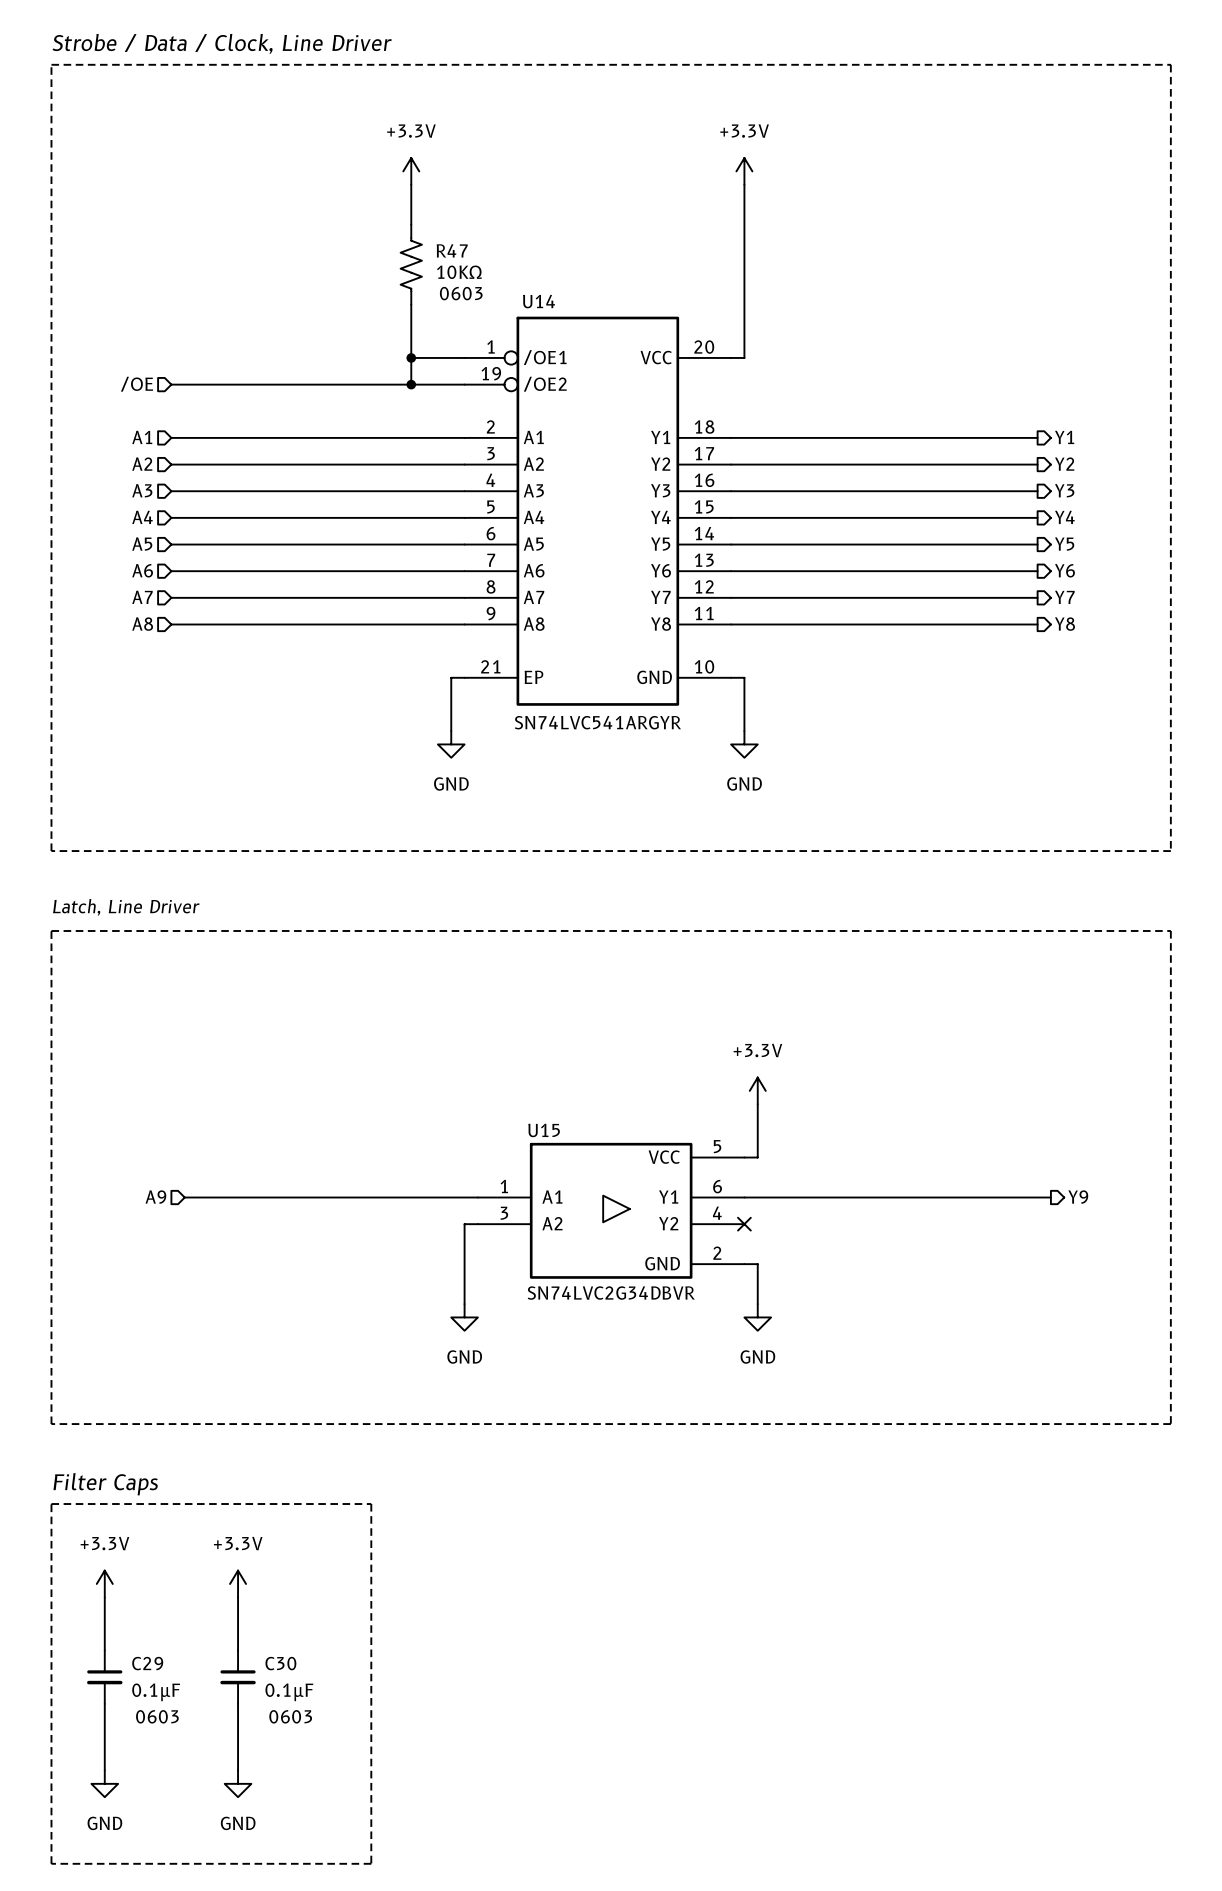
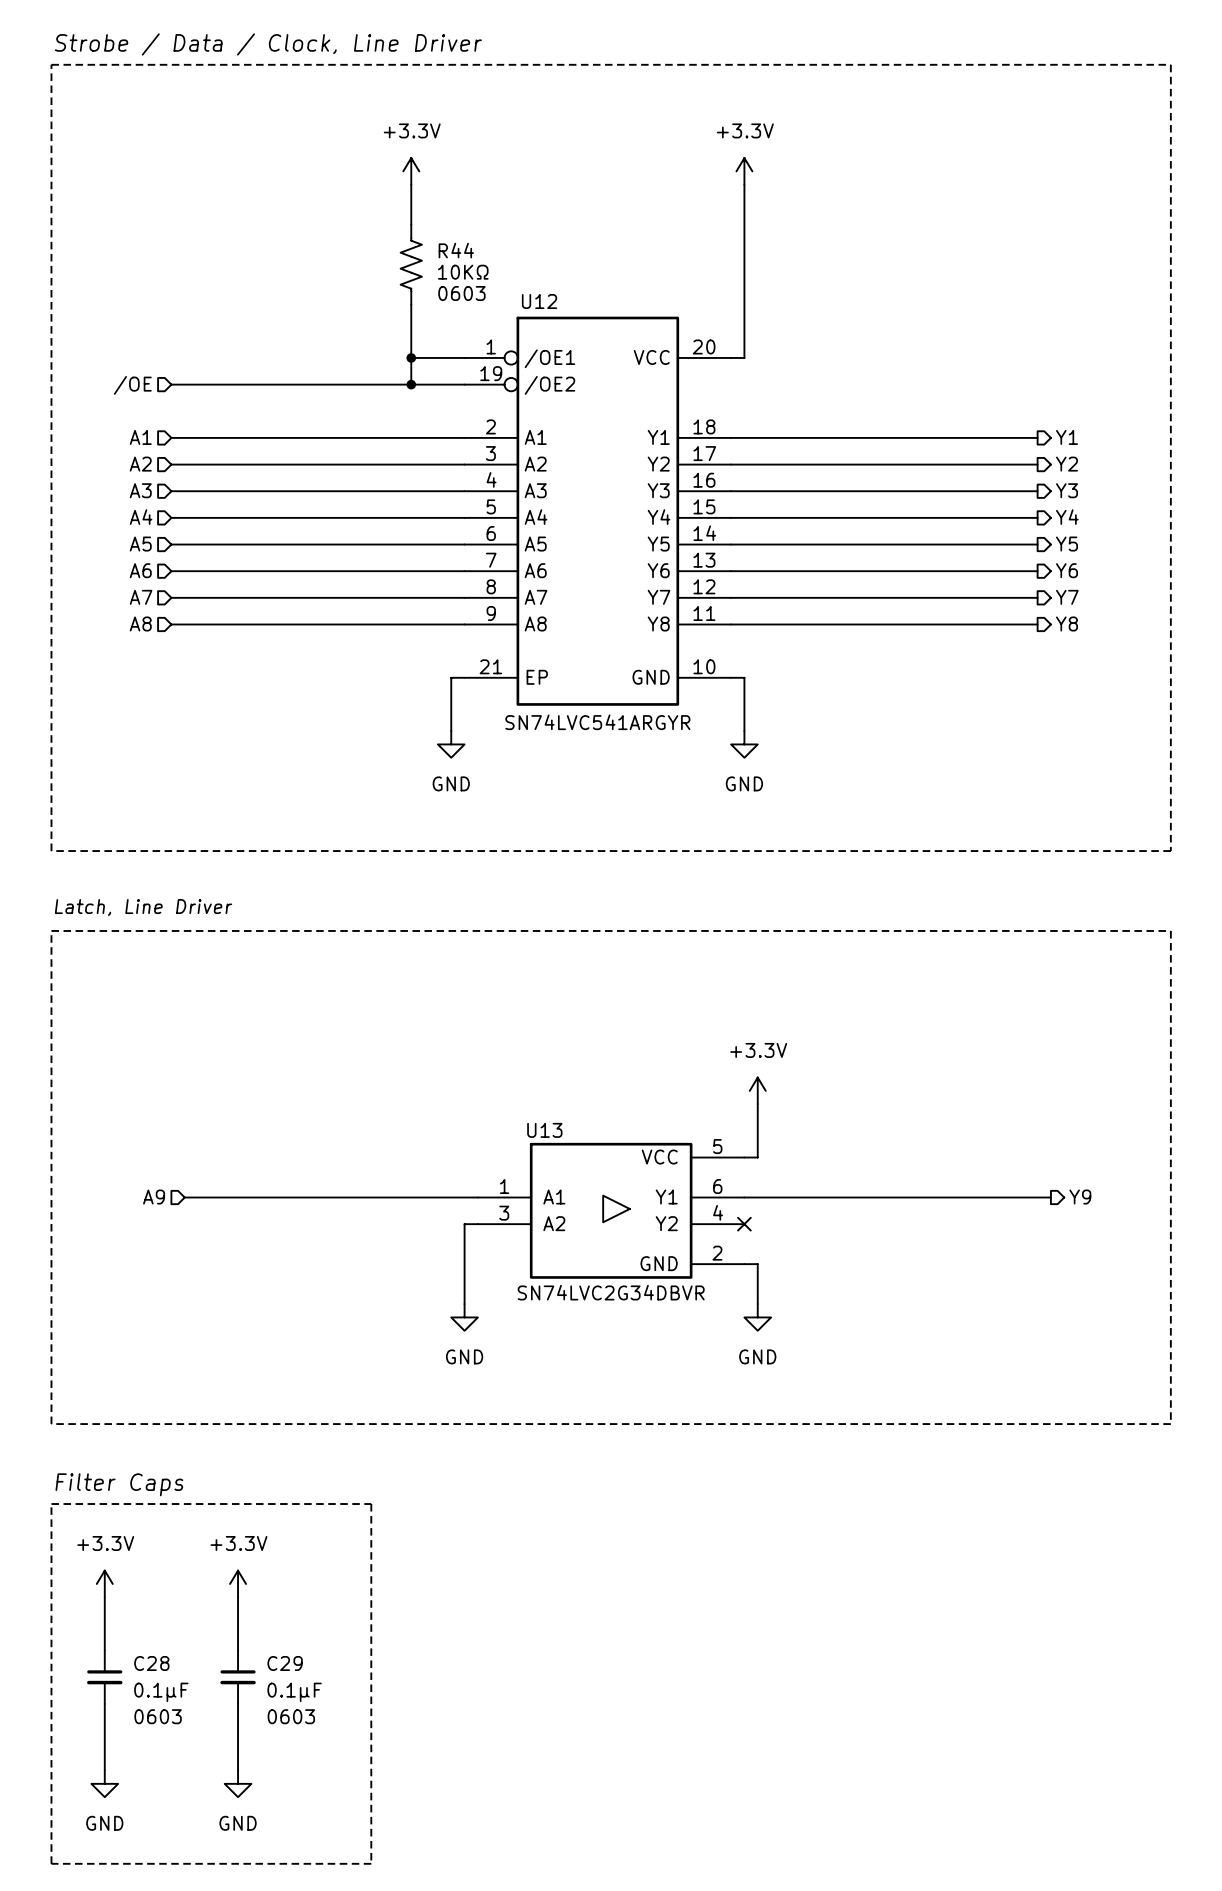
R47 name: R47 (452, 250) -> R44 (456, 250)
U14 name: U14 (538, 301) -> U12 (539, 301)
U15 name: U15 (544, 1130) -> U13 (544, 1130)
C29 name: C29 (147, 1663) -> C28 (151, 1663)
C30 name: C30 (280, 1663) -> C29 (285, 1663)

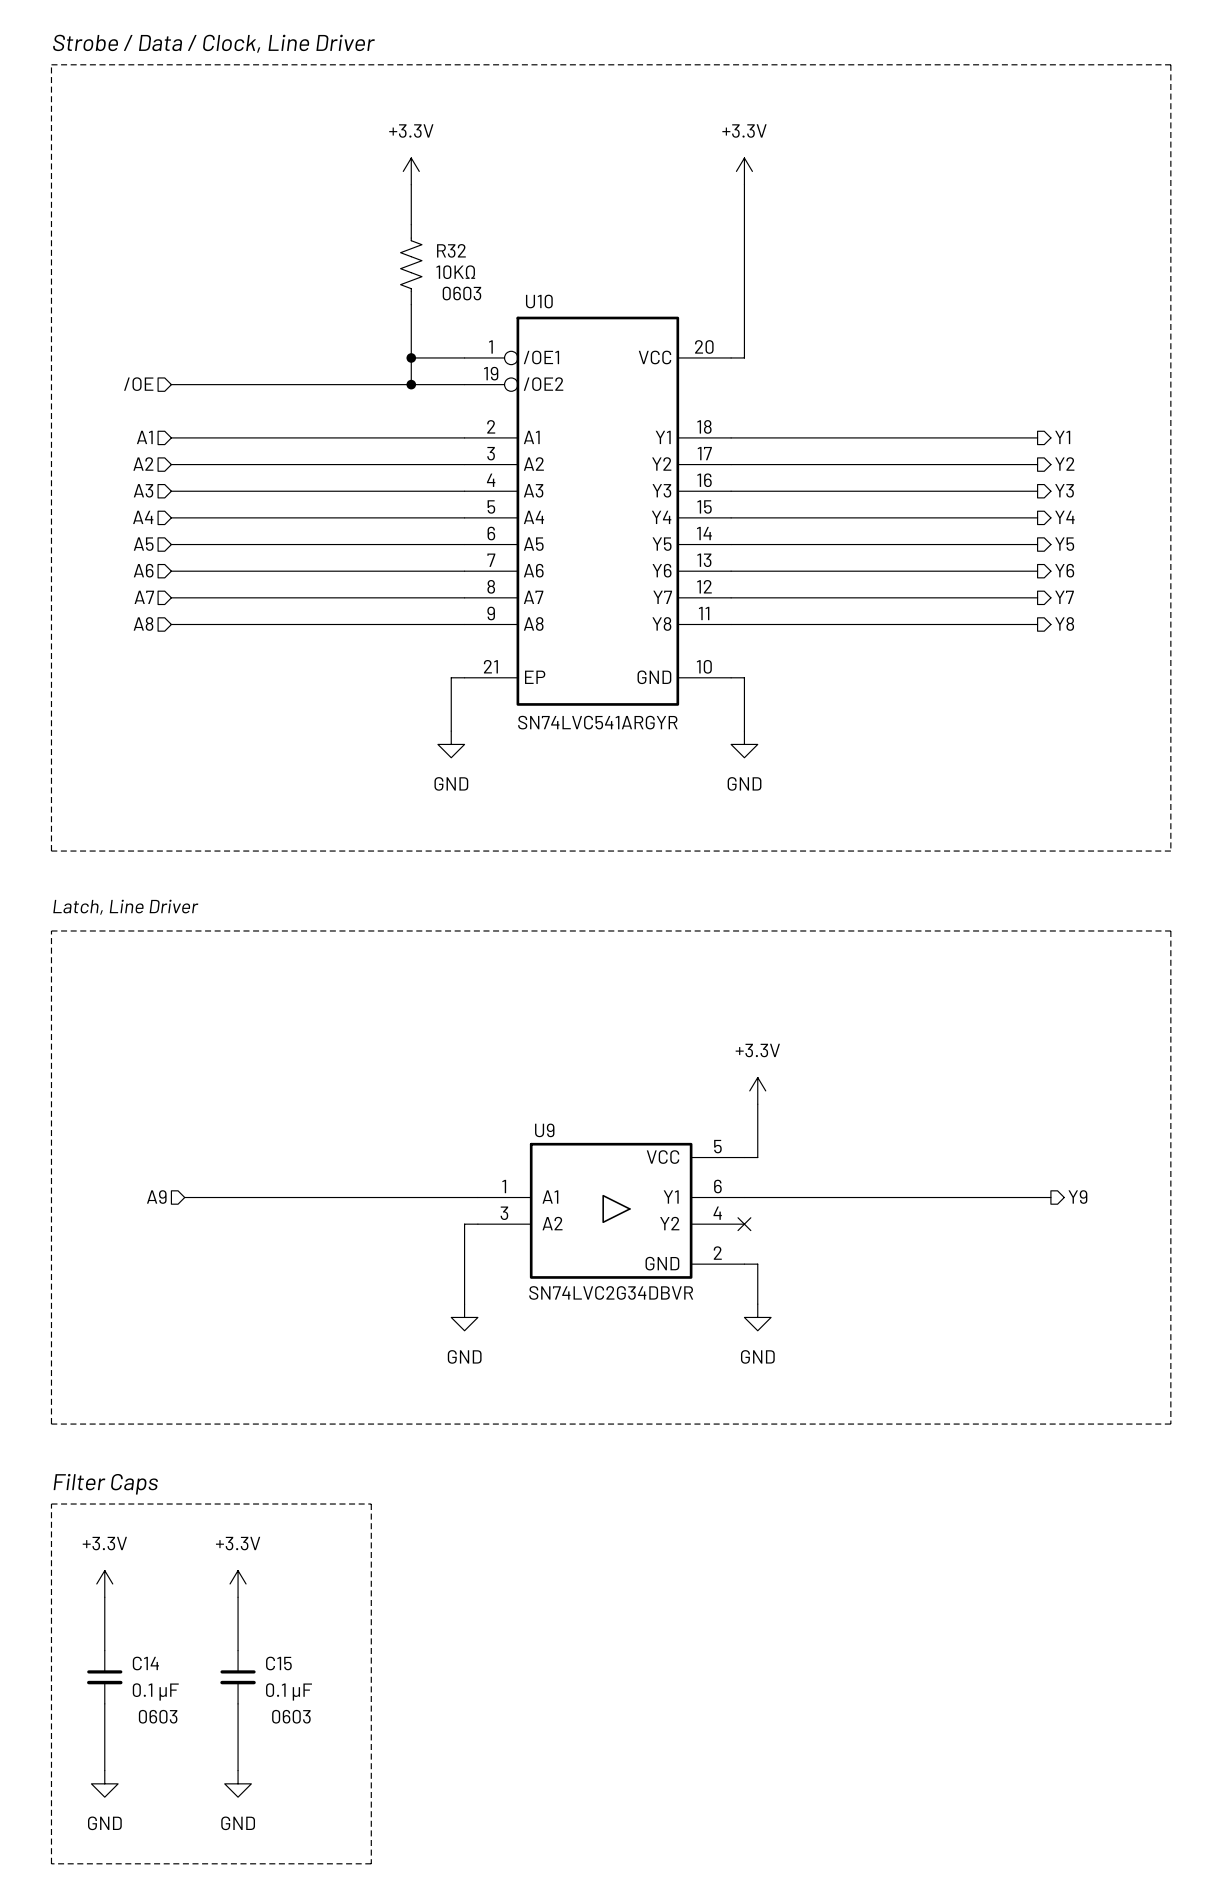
R44 name: R44 (456, 250) -> R32 (451, 250)
U12 name: U12 (539, 301) -> U10 (539, 301)
U13 name: U13 (544, 1130) -> U9 (544, 1130)
C28 name: C28 (151, 1663) -> C14 (145, 1663)
C29 name: C29 (285, 1663) -> C15 (278, 1663)
C28 value: 0.1µF (161, 1692) -> 0.1 µF (155, 1691)
C29 value: 0.1µF (294, 1692) -> 0.1 µF (289, 1691)

